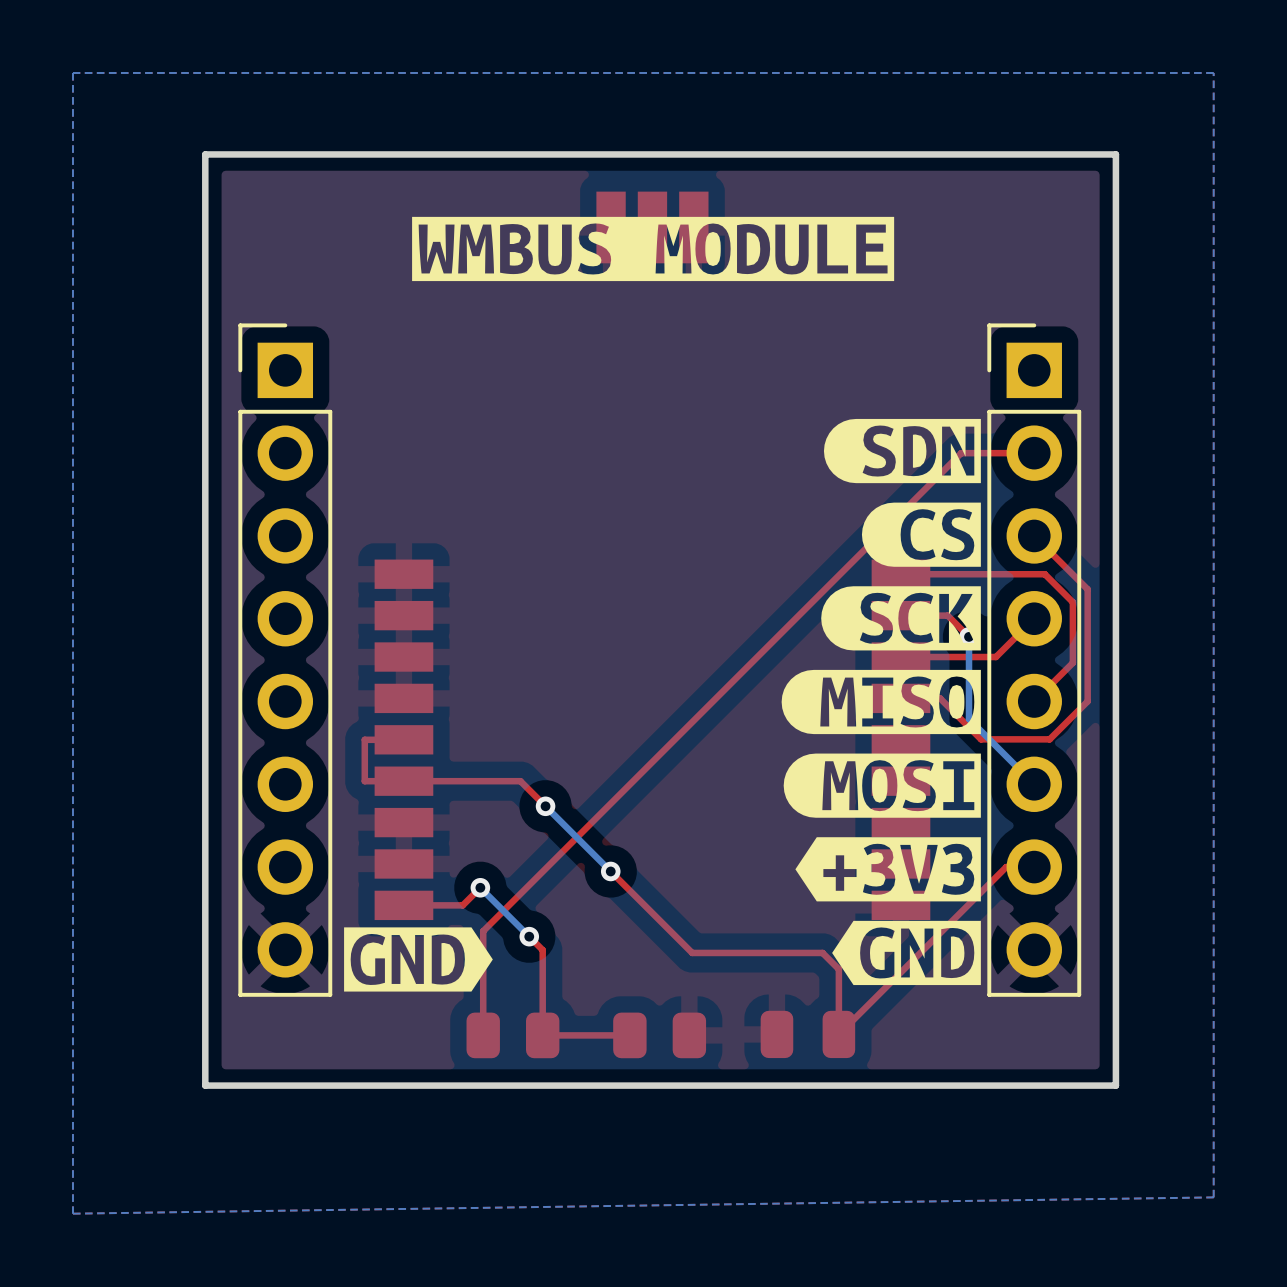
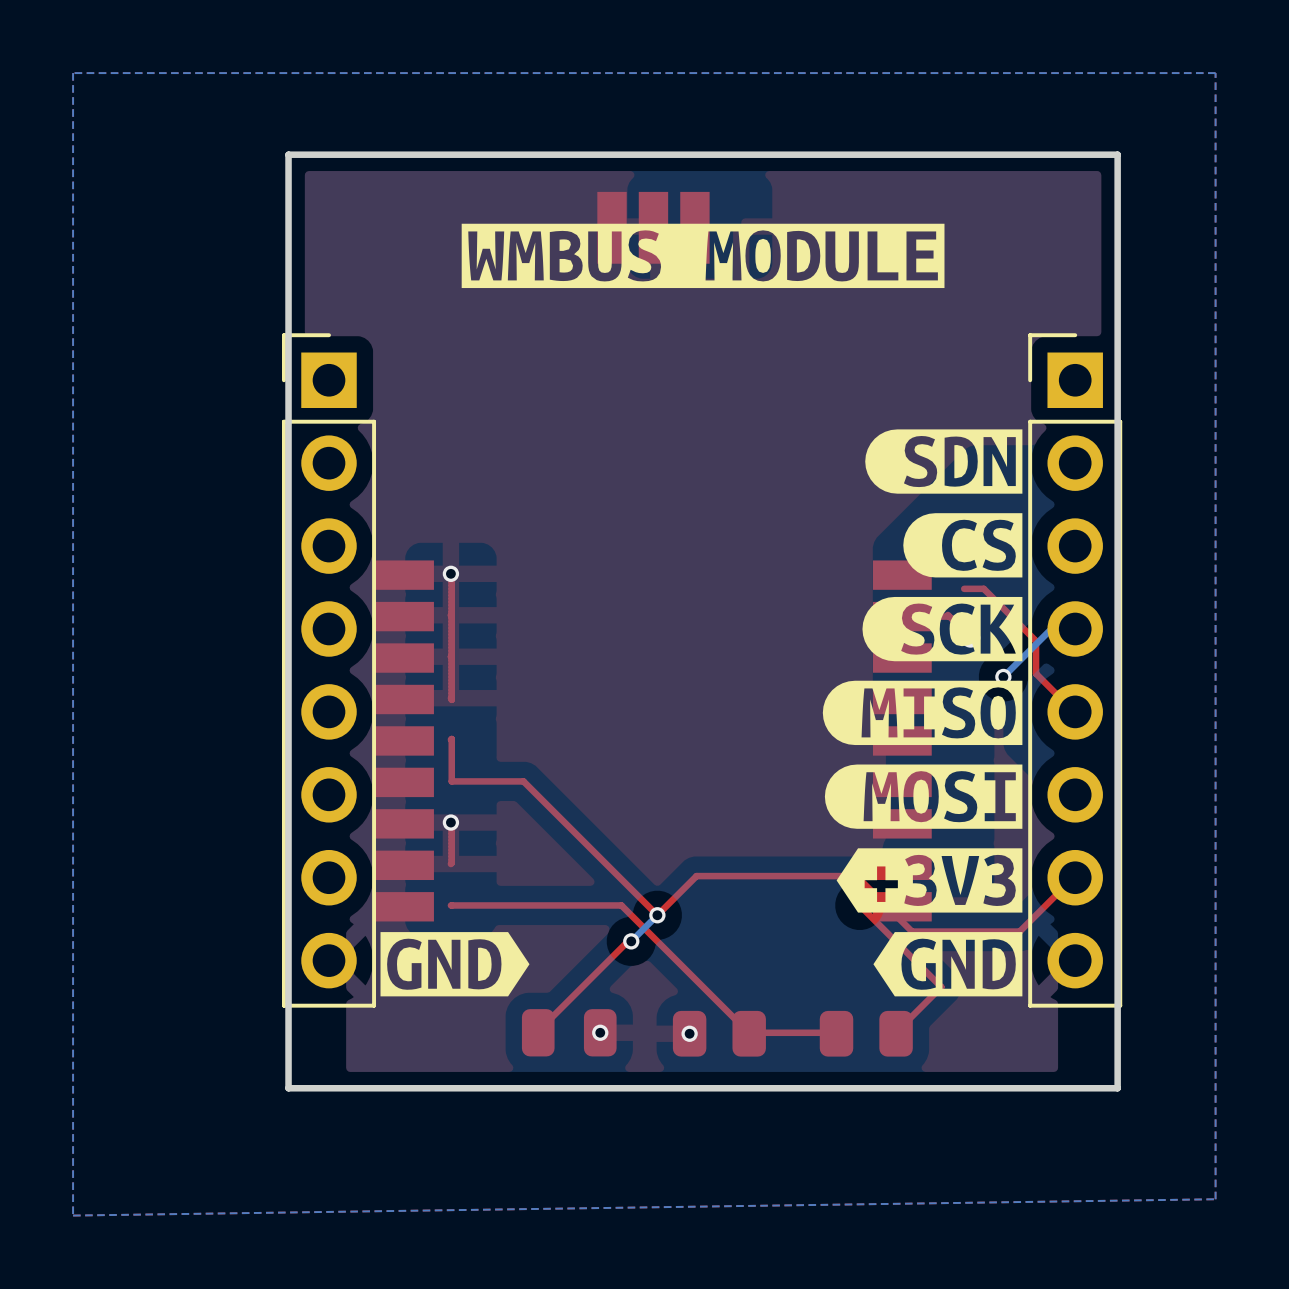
board edge: (288, 154) (205, 154) (205, 1085) (1115, 1085) -> (288, 154) (288, 1088) (1117, 1087)
drawing position: (653, 248) -> (703, 255)
drawing position: (902, 451) -> (943, 461)
top track: (1034, 453) (961, 453) (483, 931) (483, 1035) -> none
drawing position: (921, 534) -> (962, 545)
top track: (1034, 535) (1087, 589) (1087, 701) (1049, 739) (981, 739) (940, 698) (900, 698) -> none
top track: none -> (450, 573) (451, 572) (451, 699) (450, 698)
via: none -> (450, 573)
top track: (900, 574) (1044, 574) (1072, 602) (1072, 662) (1034, 701) -> none
top track: none -> (964, 588) (983, 588) (1036, 641) (1036, 673) (1075, 712)
drawing position: (901, 618) -> (942, 629)
top track: (1034, 618) (995, 657) (900, 657) -> none
bottom track: none -> (1075, 628) (1052, 628) (1003, 676)
bottom track: (969, 636) (969, 719) (1034, 784) -> none
part position: (285, 660) -> (329, 670)
part position: (1034, 660) -> (1075, 670)
via: none -> (1003, 676)
drawing position: (881, 702) -> (922, 712)
top track: none -> (450, 739) (451, 781) (523, 781) (657, 915) (696, 876) (856, 876) (912, 931) (1019, 931) (1075, 876)
top track: (403, 739) (364, 739) (364, 781) (520, 781) (545, 806) -> none
drawing position: (882, 785) -> (923, 796)
bottom track: (545, 806) (610, 871) -> none
via: (545, 806) -> none
top track: none -> (450, 822) (450, 864)
via: none -> (450, 822)
top track: (1034, 867) (1006, 867) (838, 1034) (838, 969) (822, 952) (692, 952) (610, 871) -> none
drawing position: (888, 869) -> (929, 880)
via: (610, 871) -> none
top track: (480, 887) (462, 905) (403, 905) -> none
bottom track: (480, 887) (529, 936) -> none
via: (480, 887) -> none
top track: none -> (450, 905) (621, 905) (748, 1032)
top track: none -> (859, 905) (941, 987) (896, 1033)
bottom track: none -> (657, 915) (631, 941)
via: none -> (657, 915)
top track: (529, 936) (542, 950) (542, 1035) (629, 1035) -> none
via: (529, 936) -> none
top track: none -> (628, 941) (536, 1032) (538, 1032)
via: none -> (631, 941)
drawing position: (906, 952) -> (947, 964)
drawing position: (418, 959) -> (455, 964)
via: none -> (600, 1032)
top track: none -> (748, 1032) (836, 1033)
via: none -> (689, 1033)
part: none -> (866, 1033)
part position: (807, 1034) -> (569, 1032)
part: (512, 1035) -> none
part position: (659, 1035) -> (719, 1033)

